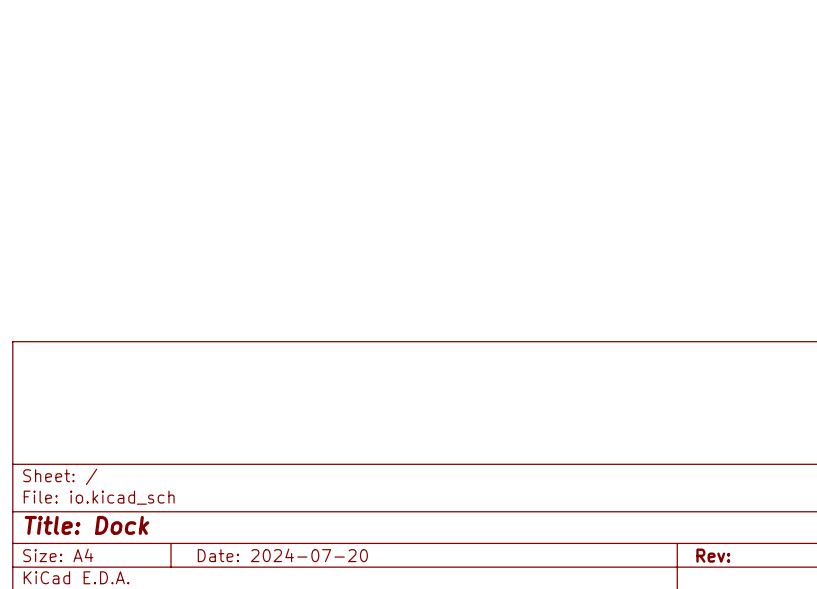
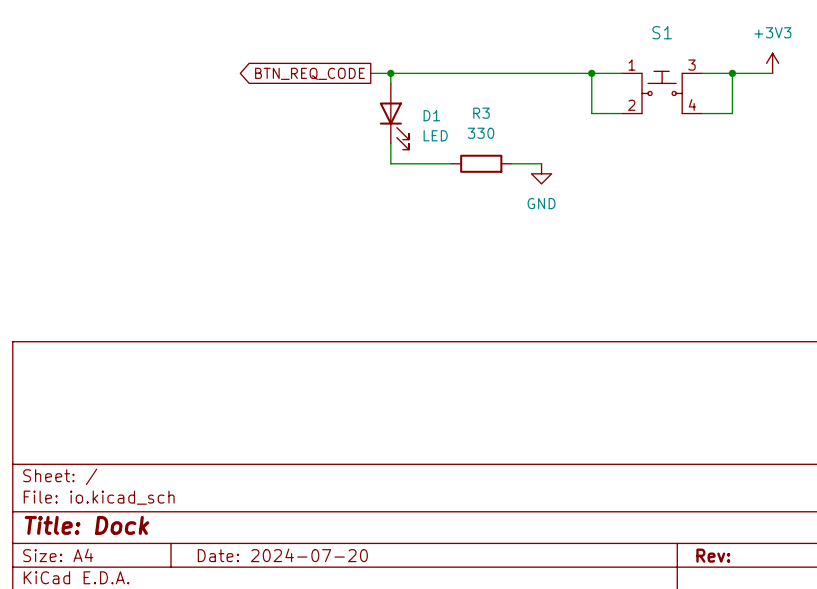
power symbol: none -> +3V3 (772, 63)
global label: none -> BTN_REQ_CODE (309, 73)
wire: none -> (370, 73) (621, 73)
wire: none -> (390, 73) (390, 83)
junction: none -> (390, 73)
wire: none -> (591, 73) (591, 113) (621, 113)
junction: none -> (591, 73)
wire: none -> (702, 73) (772, 73)
wire: none -> (732, 73) (732, 113) (702, 113)
junction: none -> (732, 73)
S1: none -> (662, 92)
D1: none -> LED (394, 116)
wire: none -> (390, 143) (390, 163) (451, 163)
R3: none -> 330 (481, 163)
wire: none -> (511, 163) (541, 163)
power symbol: none -> GND (541, 173)

